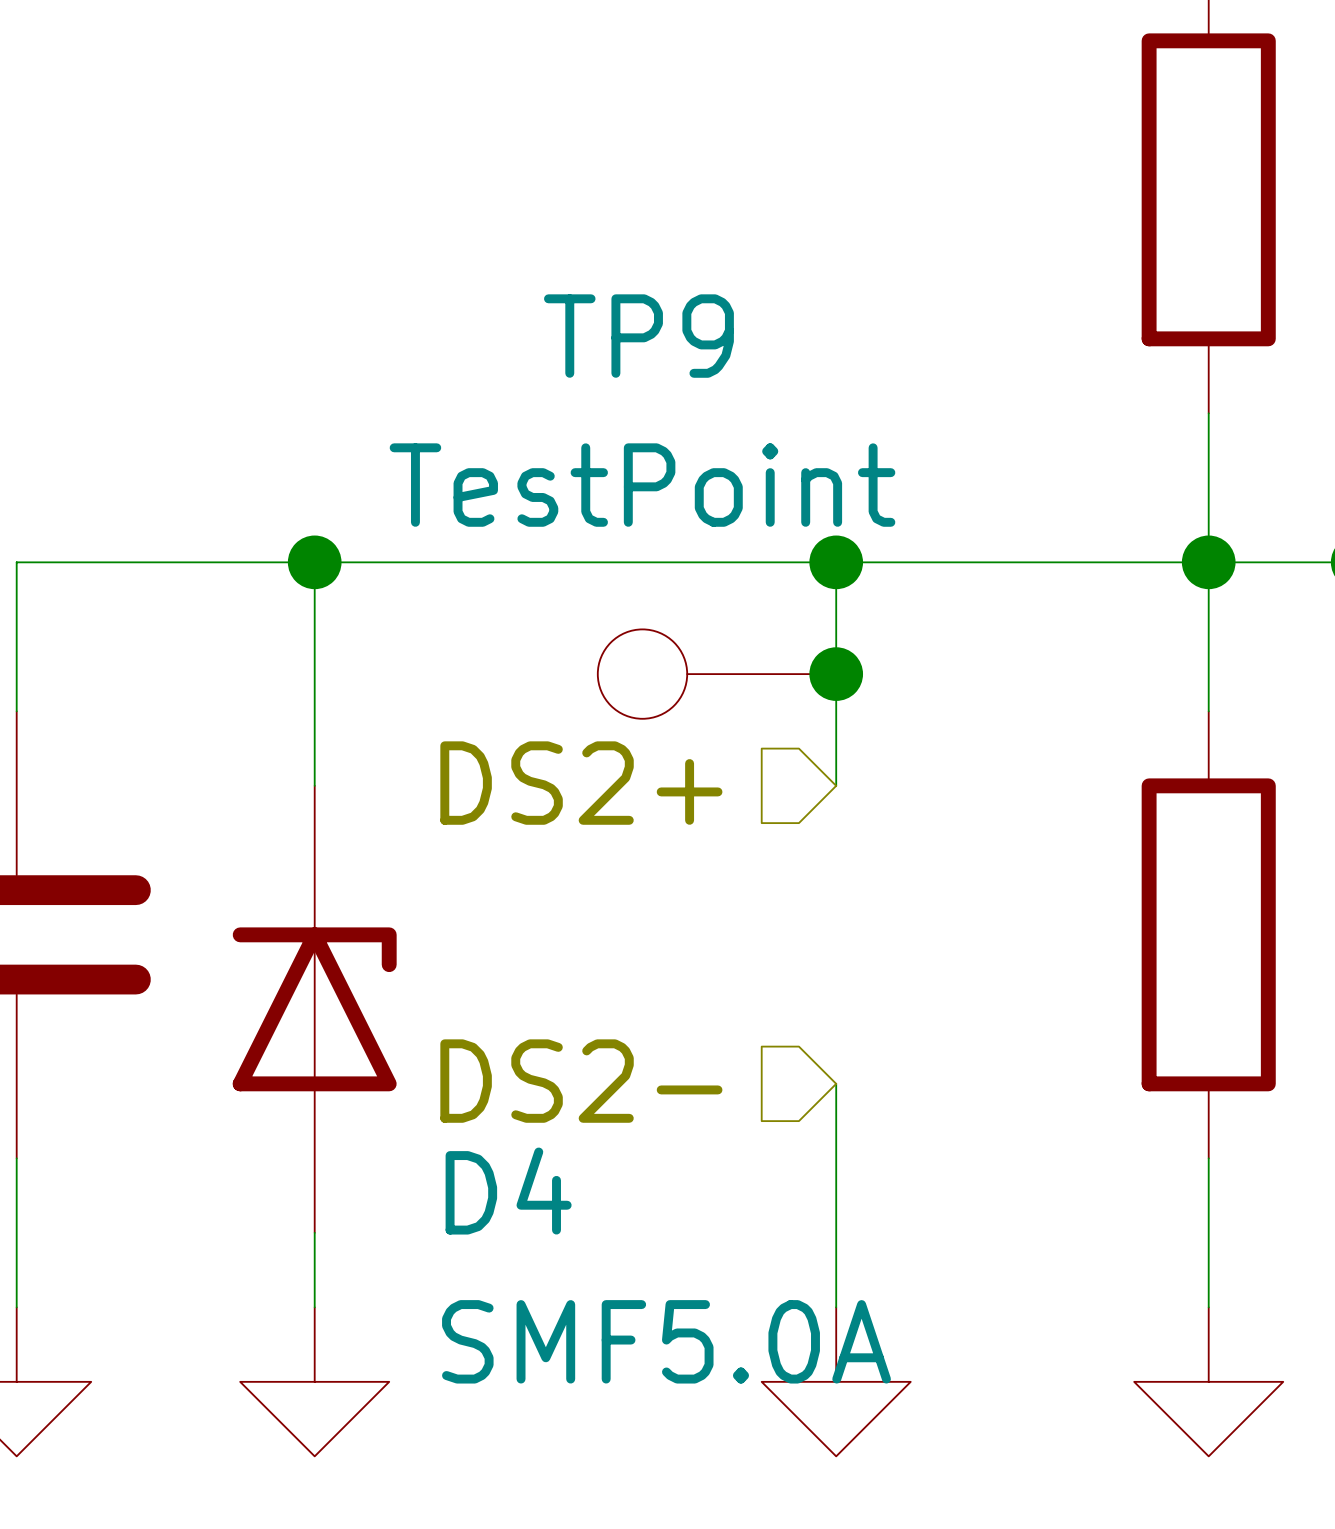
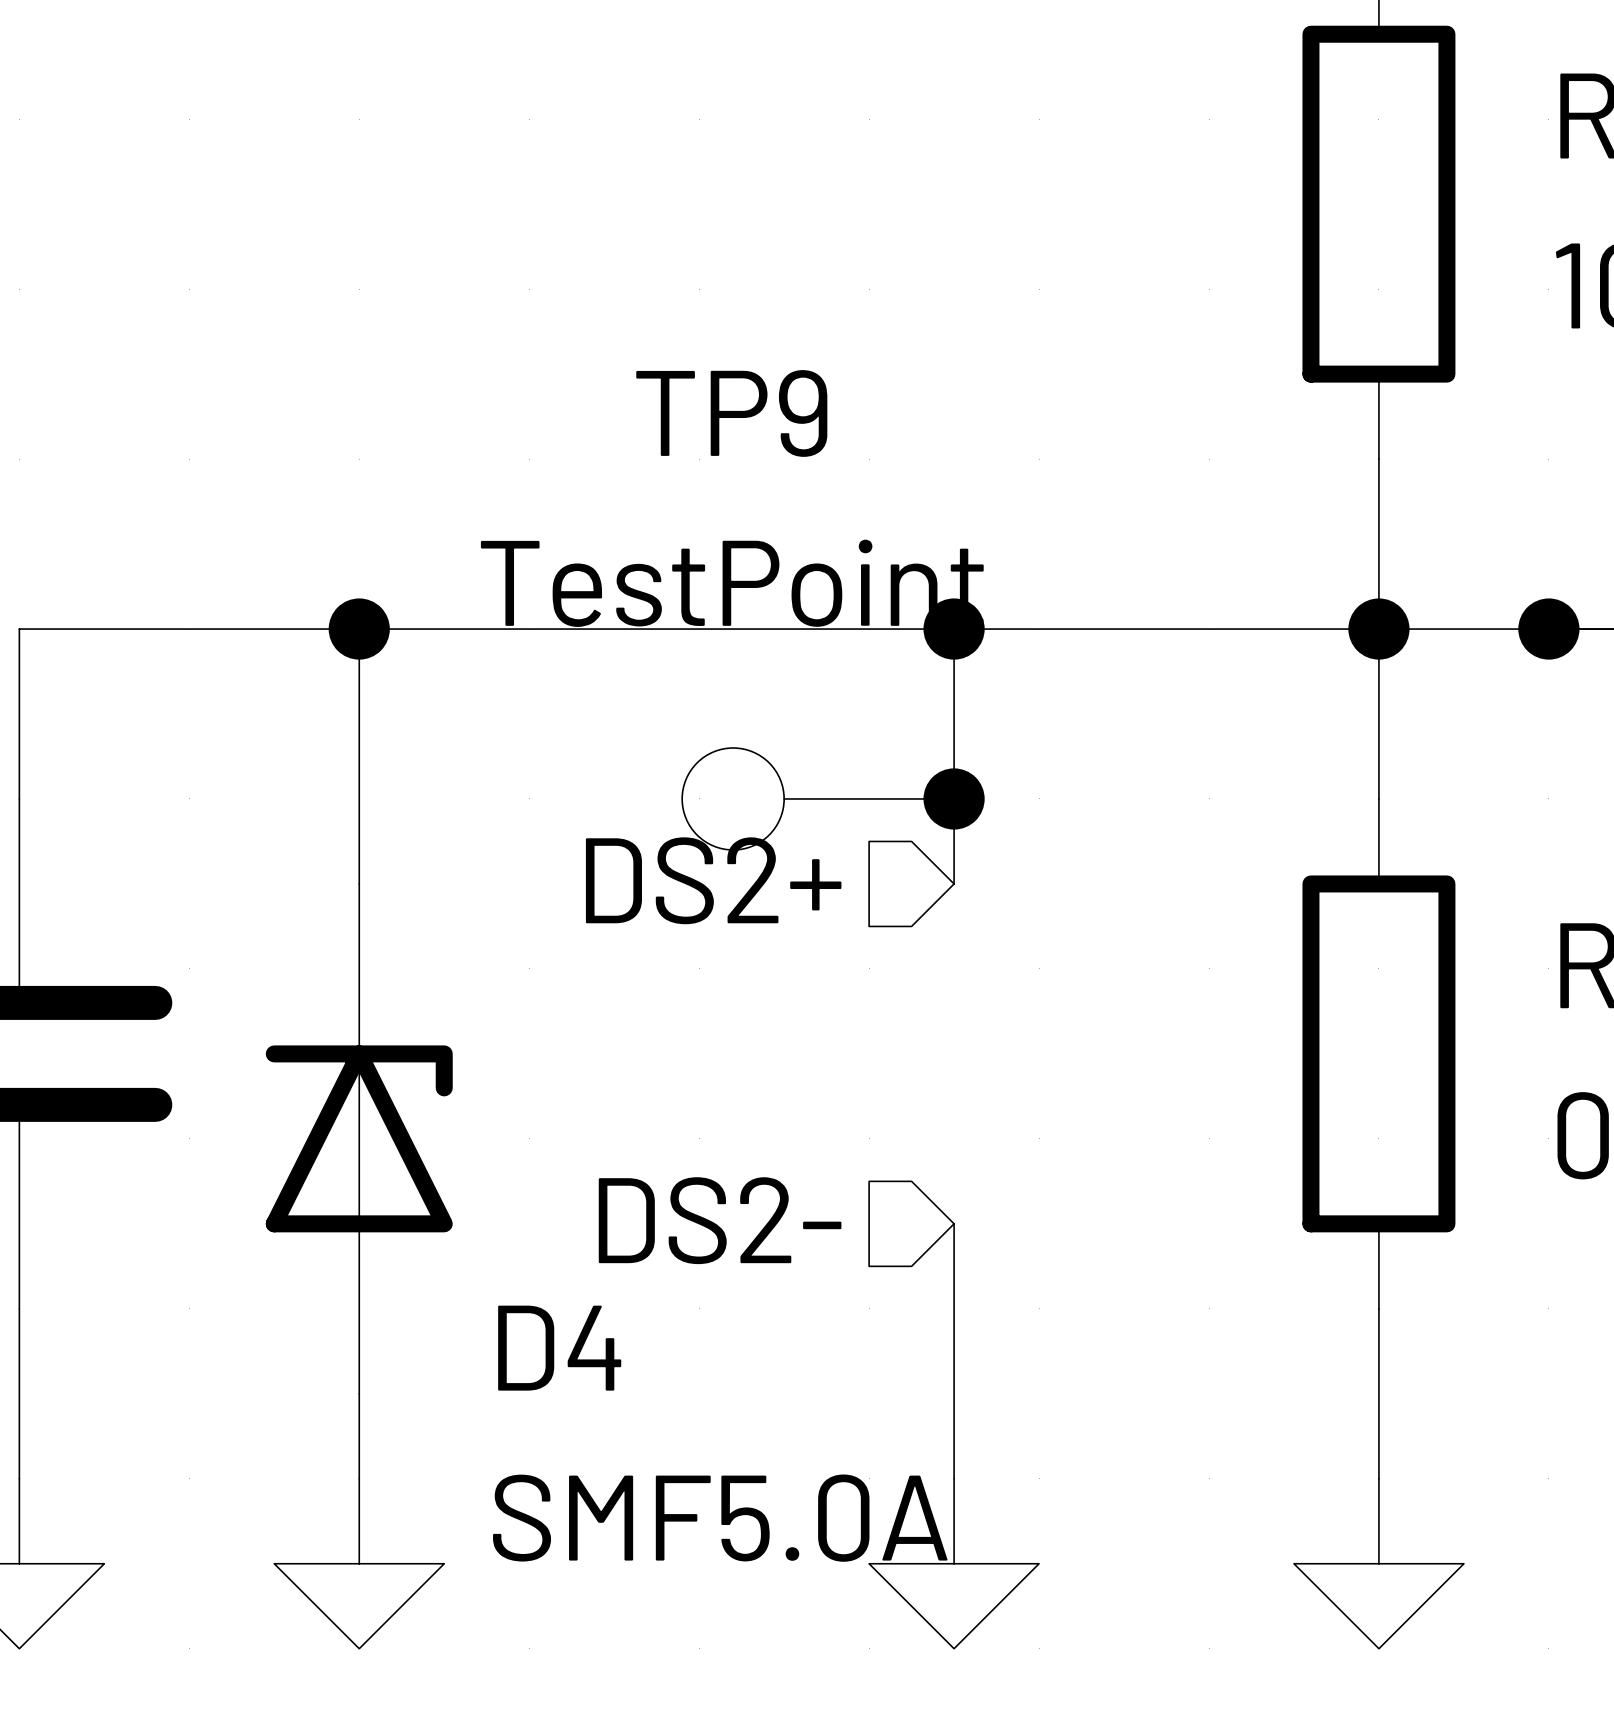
TP9 position: (717, 674) -> (818, 798)
junction position: (836, 674) -> (954, 798)

